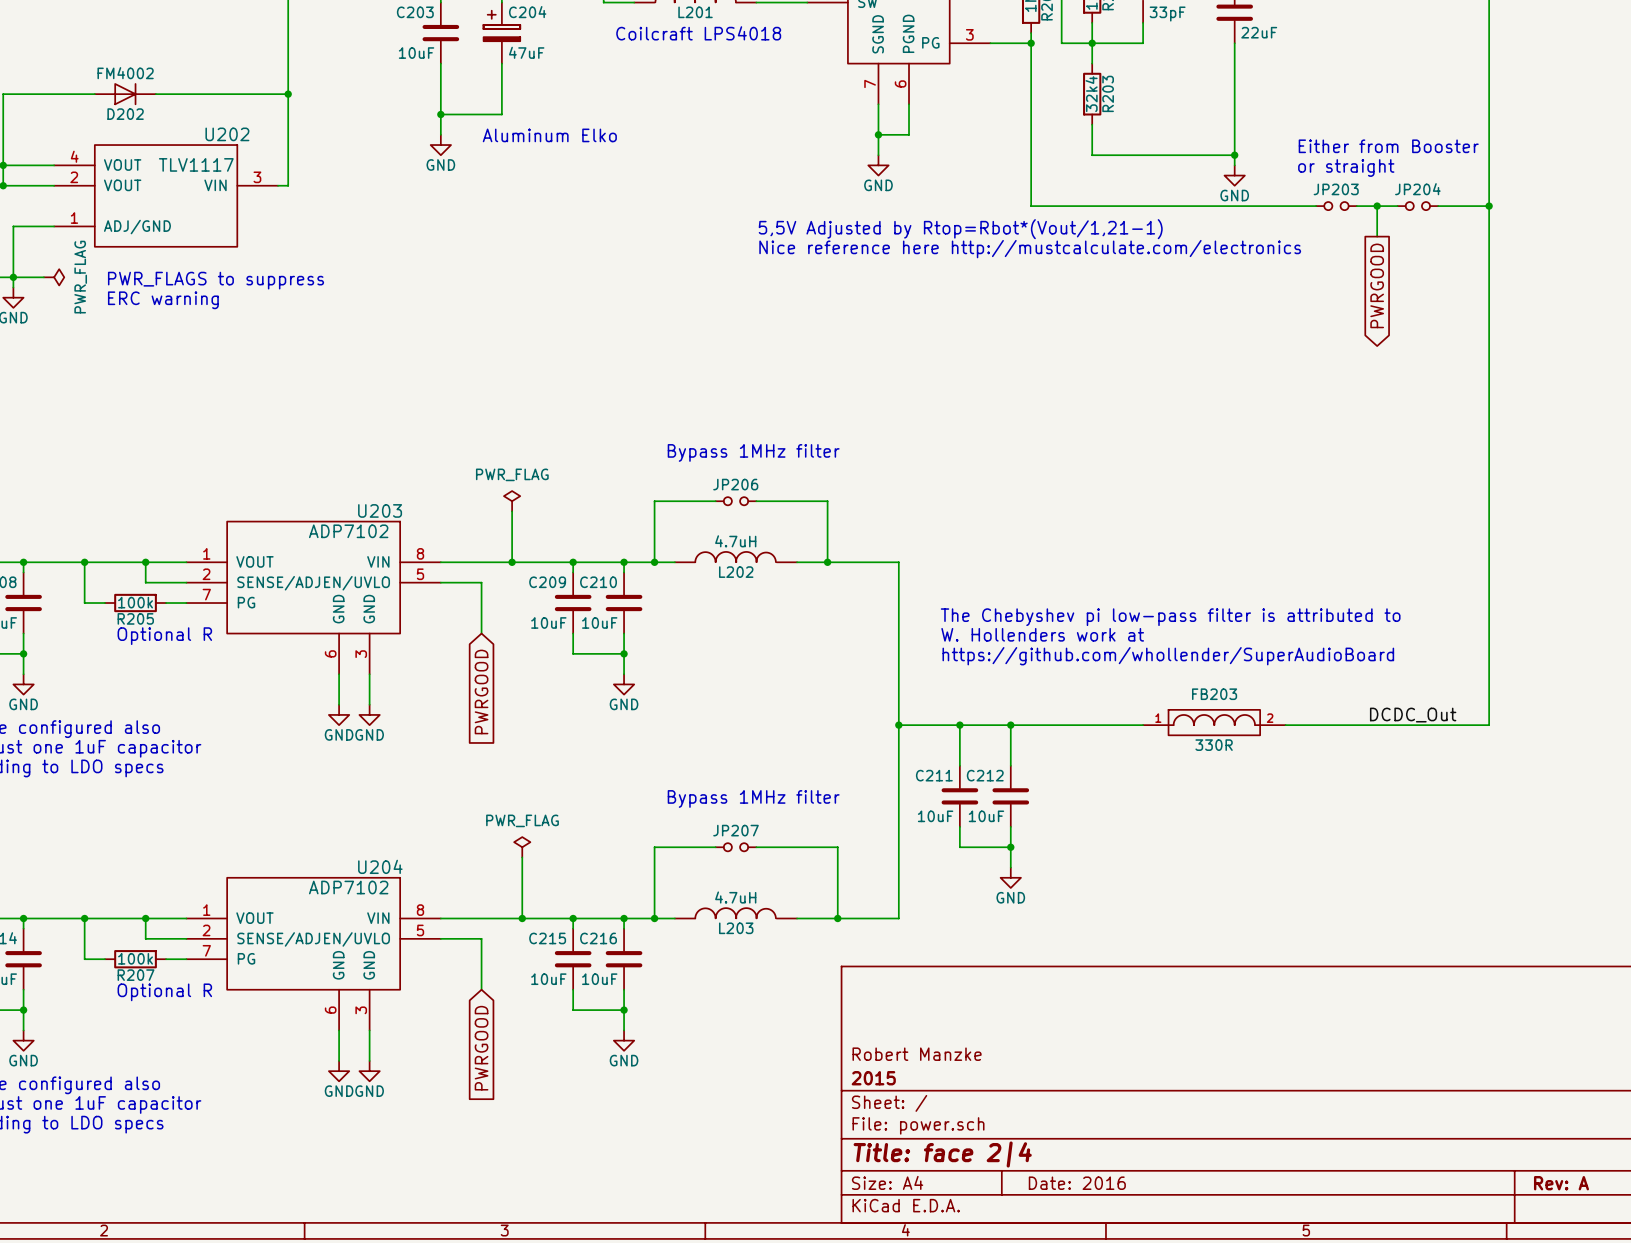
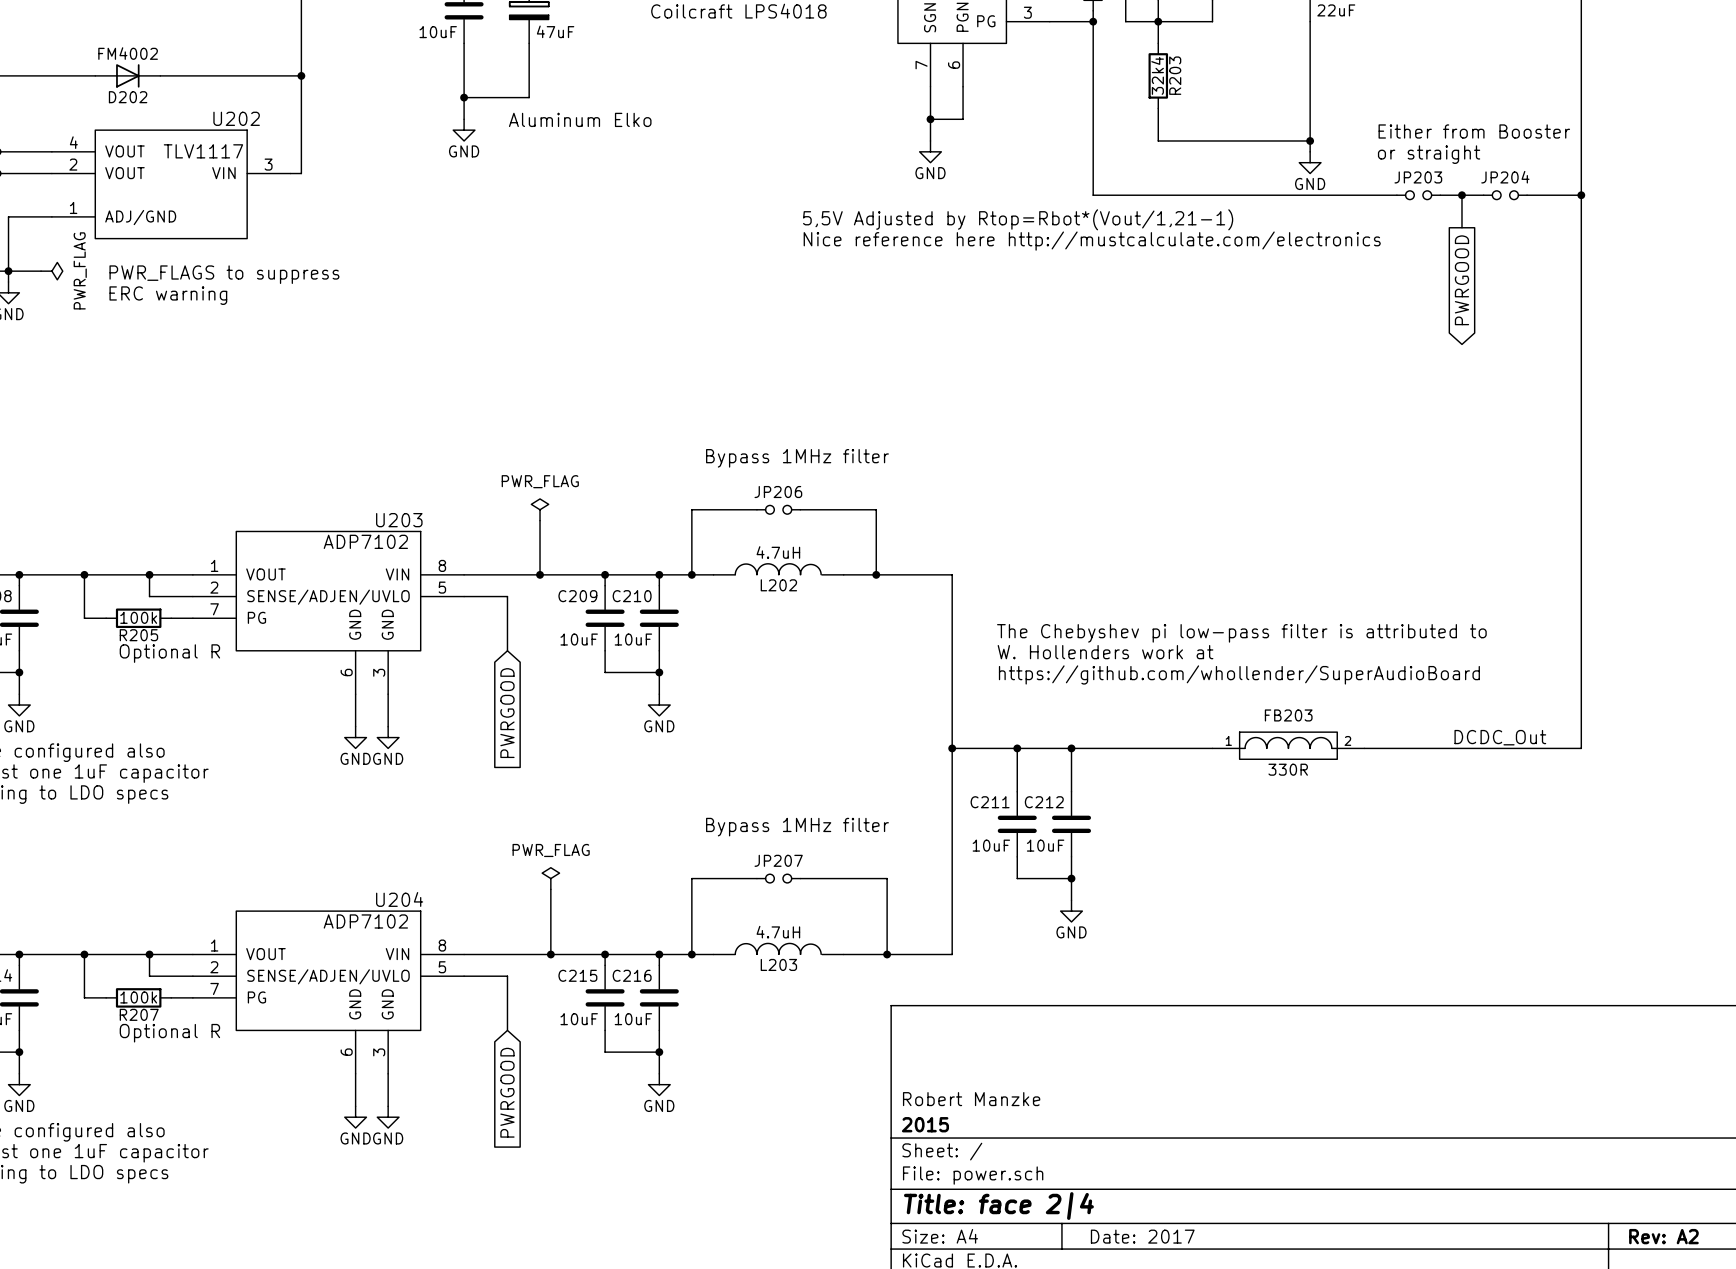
title block: Date: 2016 (1077, 1183) -> Date: 2017 (1142, 1236)
title block: Rev: A (1561, 1183) -> Rev: A2 (1663, 1236)

